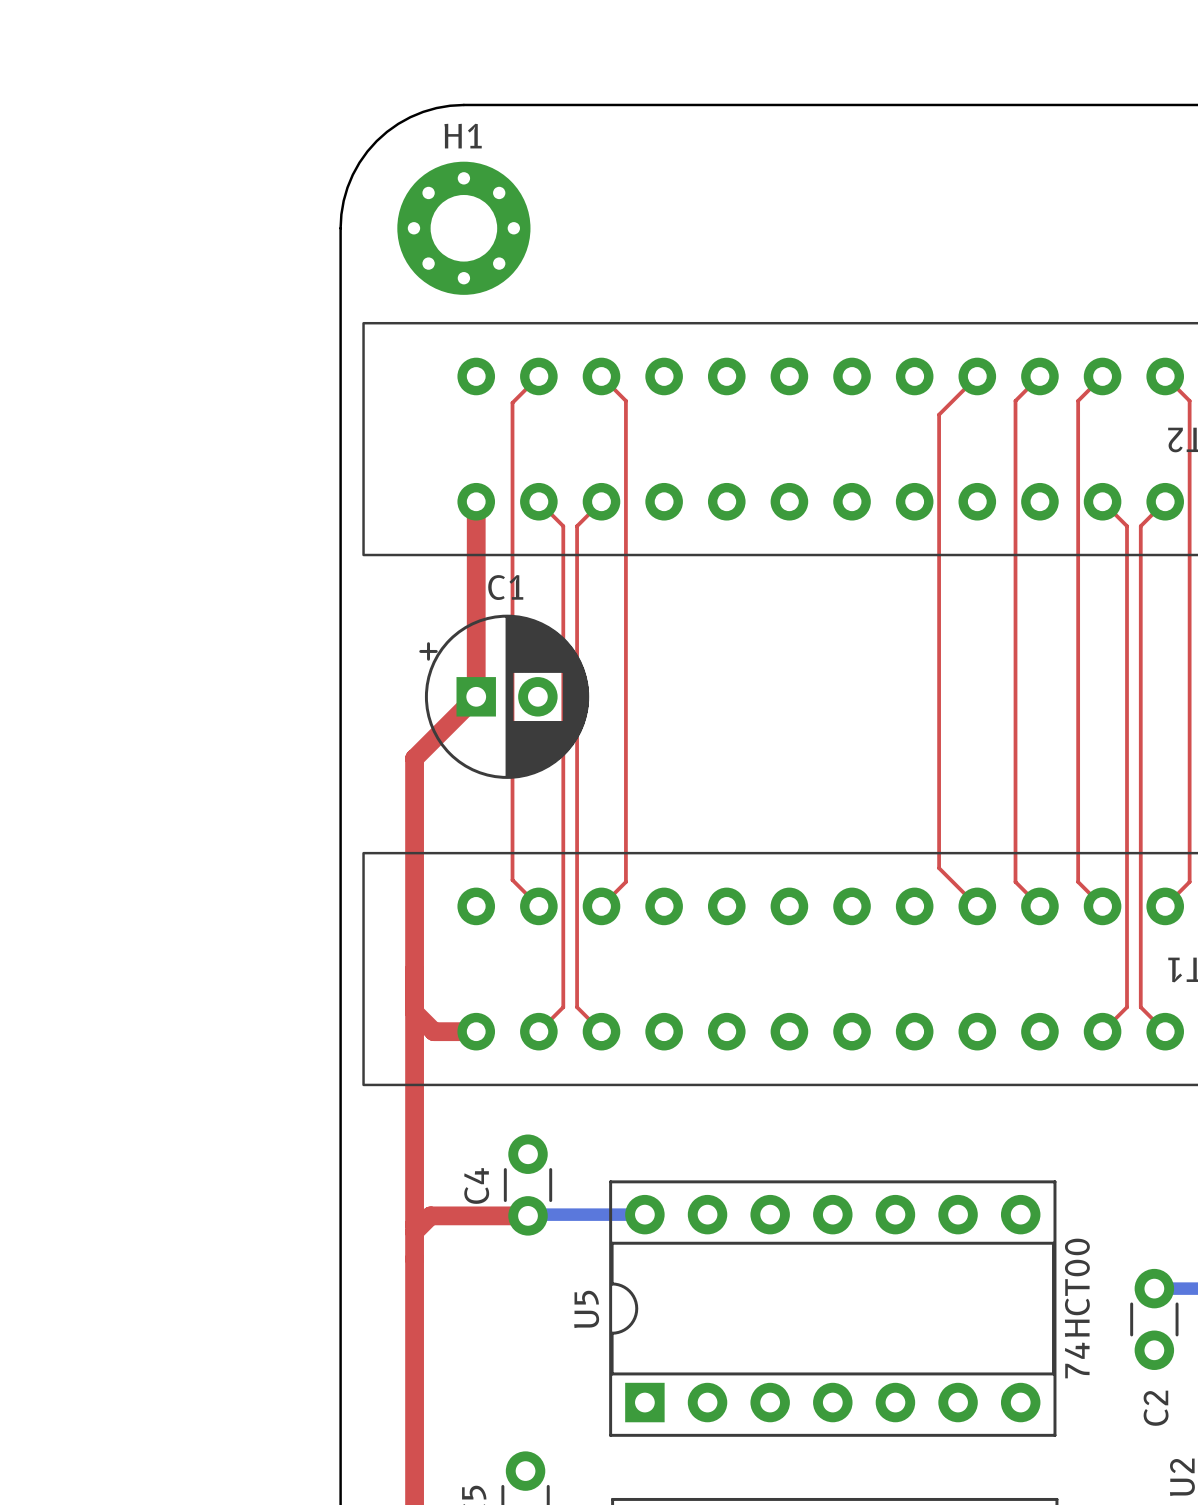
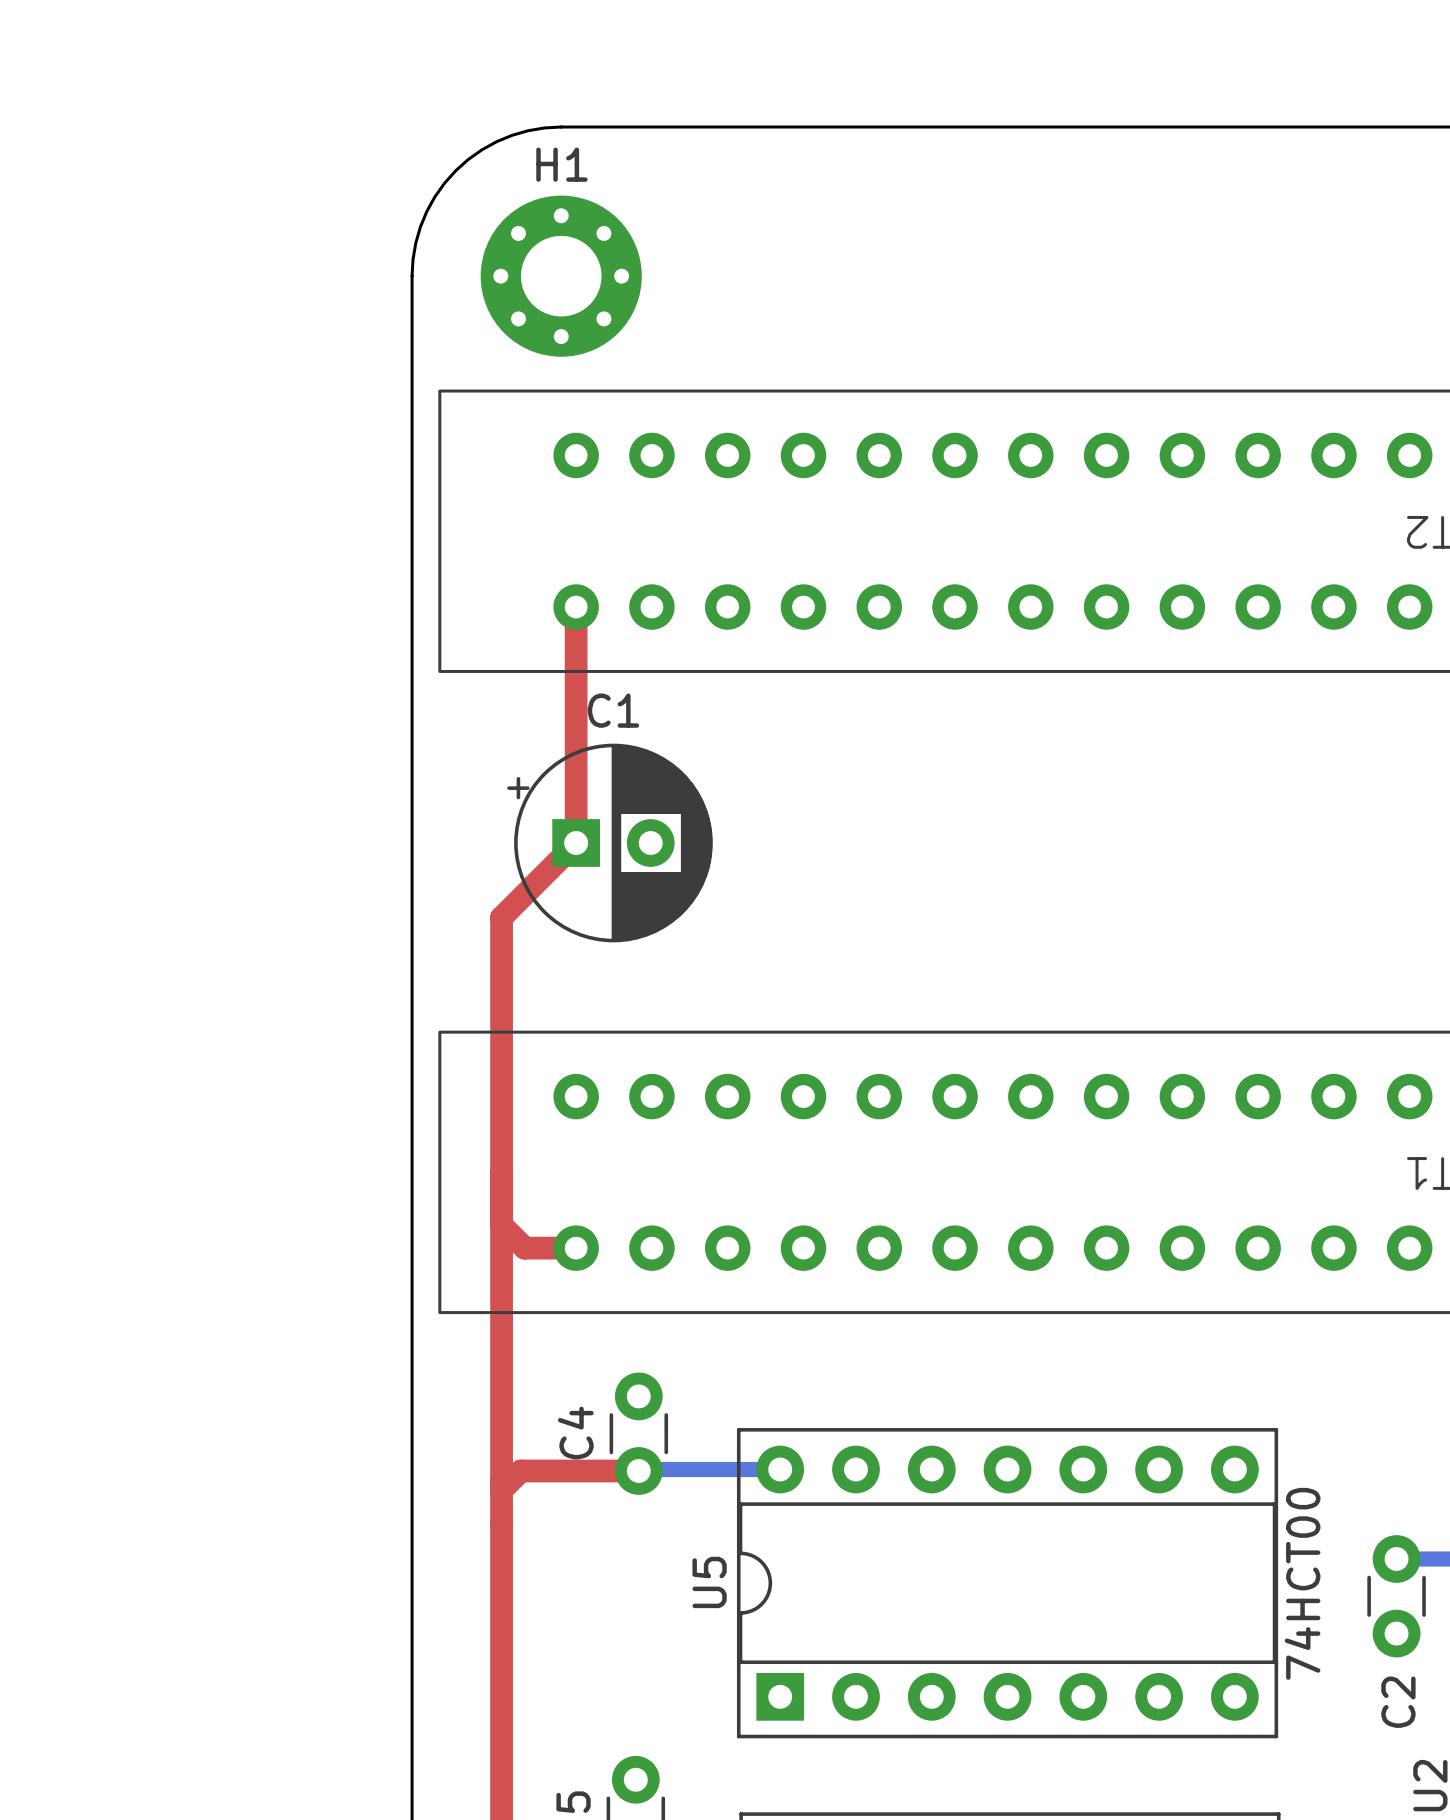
top track: (538, 376) (512, 402) (512, 880) (538, 906) -> none
top track: (601, 376) (625, 400) (625, 881) (601, 906) -> none
top track: (977, 376) (939, 414) (939, 868) (977, 906) -> none
top track: (1039, 376) (1015, 400) (1015, 881) (1039, 906) -> none
top track: (1102, 376) (1078, 400) (1078, 881) (1102, 906) -> none
top track: (1165, 376) (1189, 400) (1189, 881) (1165, 906) -> none
top track: (538, 501) (563, 526) (563, 1007) (538, 1031) -> none
top track: (601, 501) (577, 526) (577, 1007) (601, 1031) -> none
top track: (1102, 501) (1127, 526) (1127, 1007) (1102, 1031) -> none
top track: (1165, 501) (1140, 526) (1140, 1007) (1165, 1031) -> none

